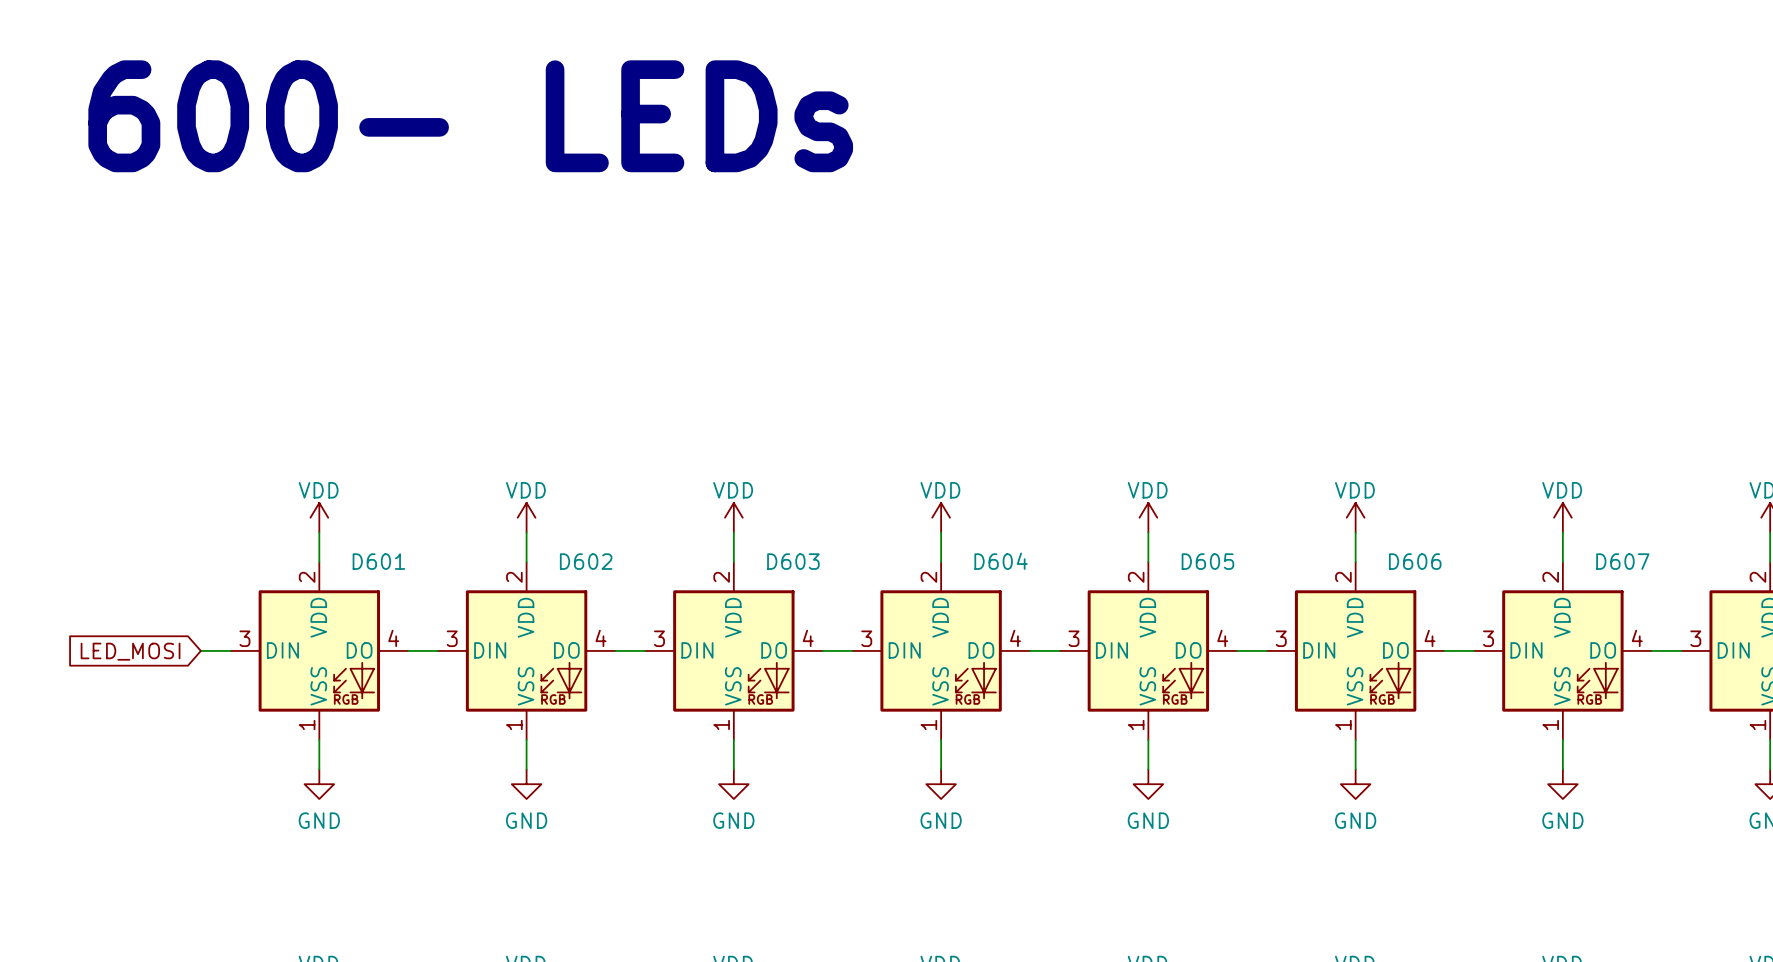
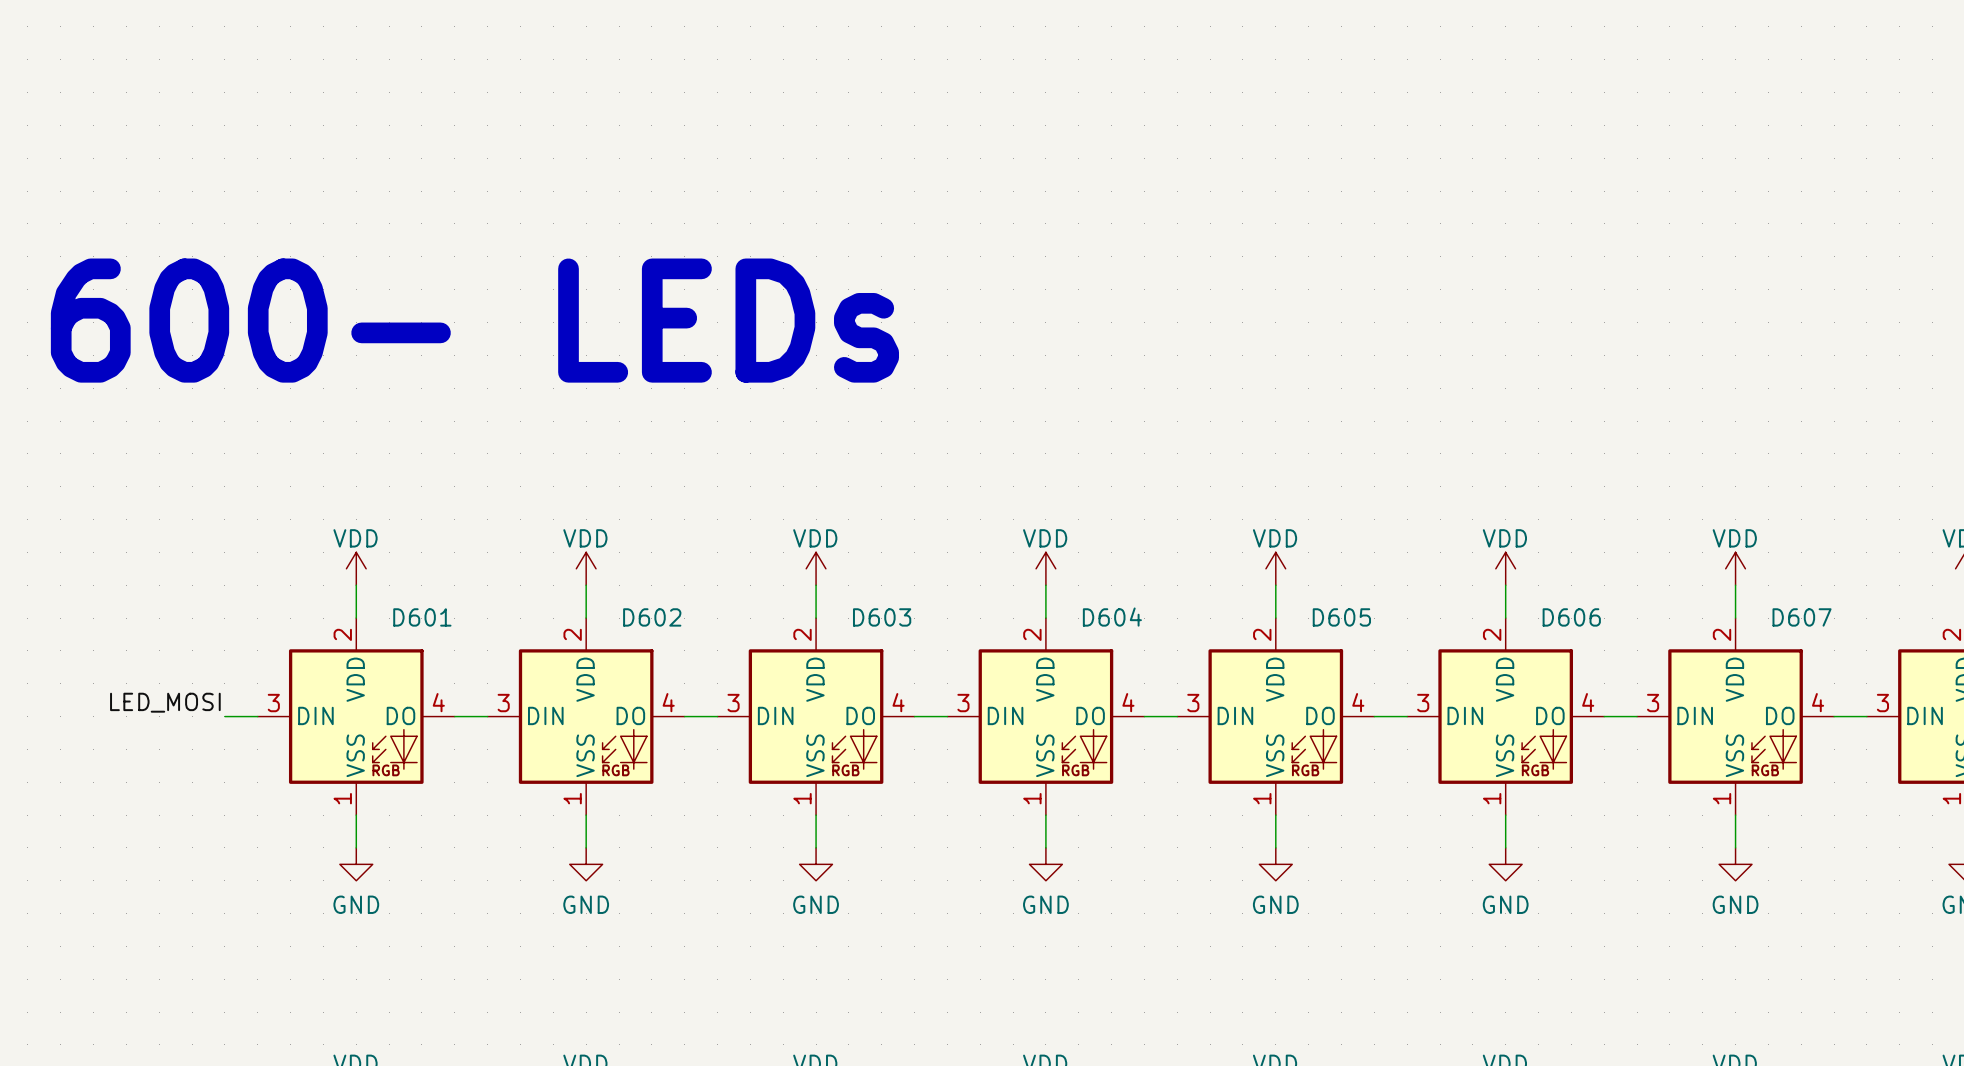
text position: 600- LEDs (470, 116) -> 600- LEDs (474, 320)
label: none -> LED_MOSI (165, 702)
global label: LED_MOSI (130, 651) -> none

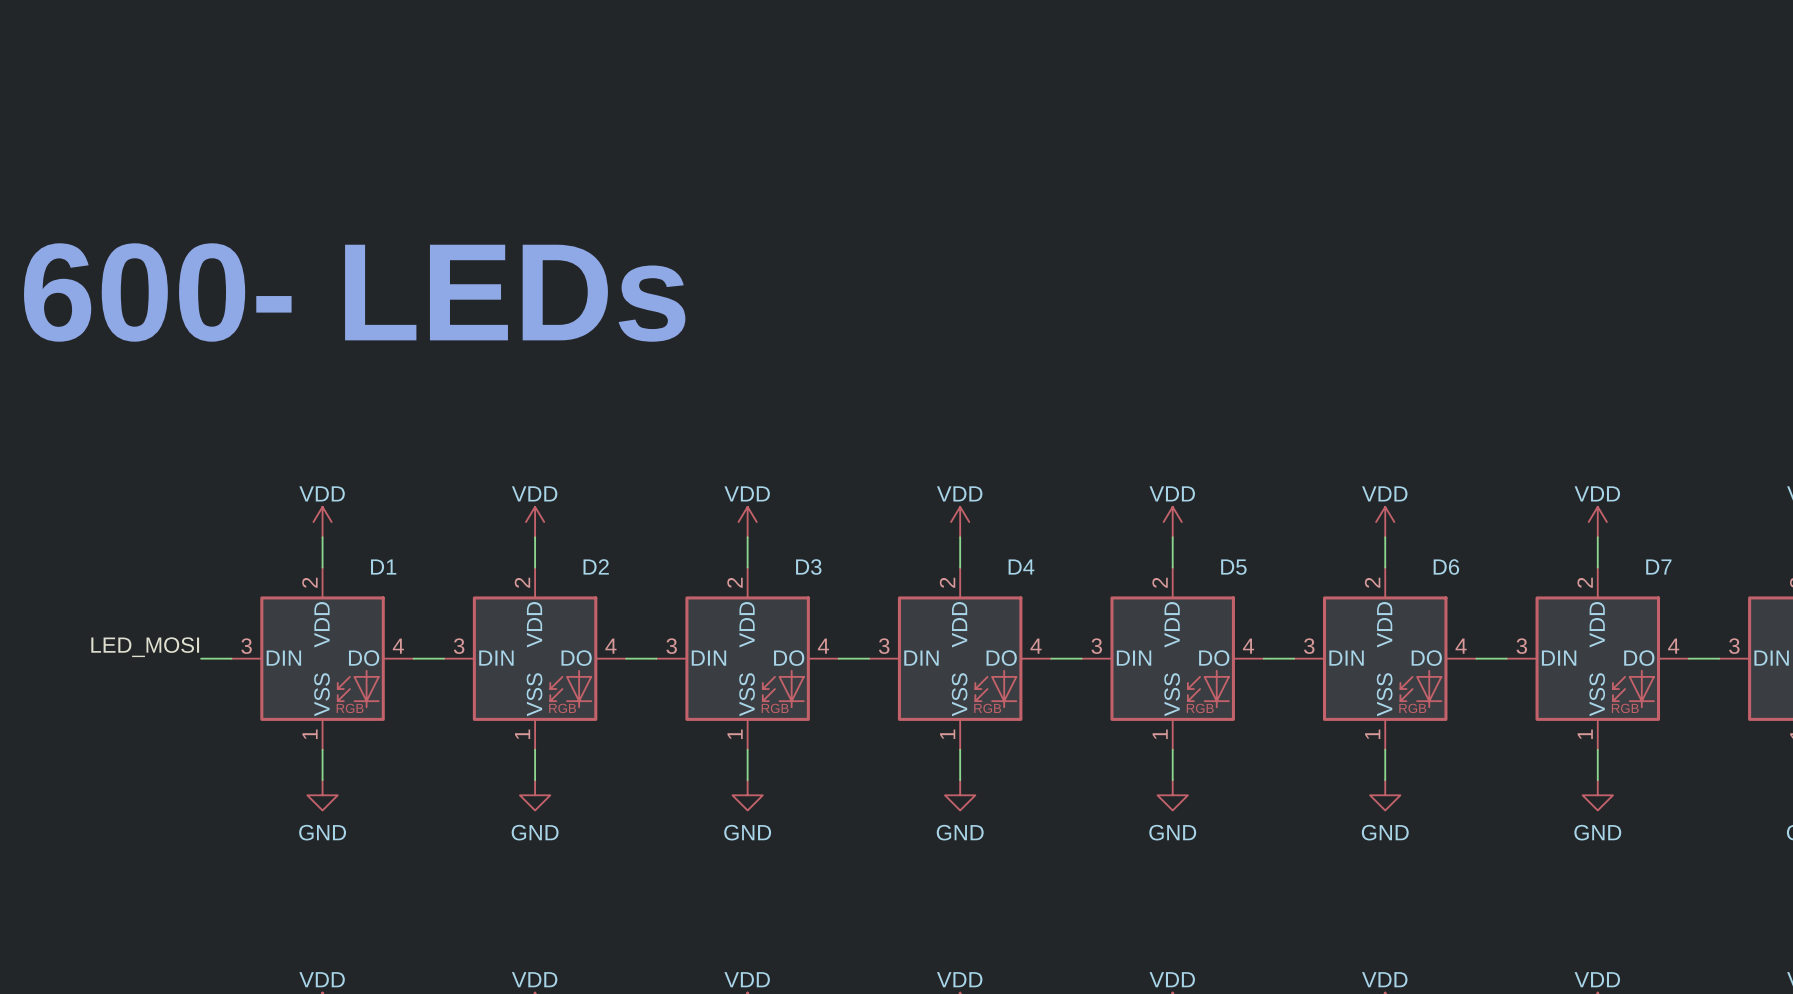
D601 name: D601 (422, 617) -> D1 (383, 567)
D602 name: D602 (652, 617) -> D2 (596, 566)
D603 name: D603 (882, 617) -> D3 (808, 567)
D604 name: D604 (1112, 617) -> D4 (1021, 567)
D605 name: D605 (1341, 617) -> D5 (1233, 567)
D606 name: D606 (1571, 617) -> D6 (1446, 567)
D607 name: D607 (1802, 617) -> D7 (1658, 567)

